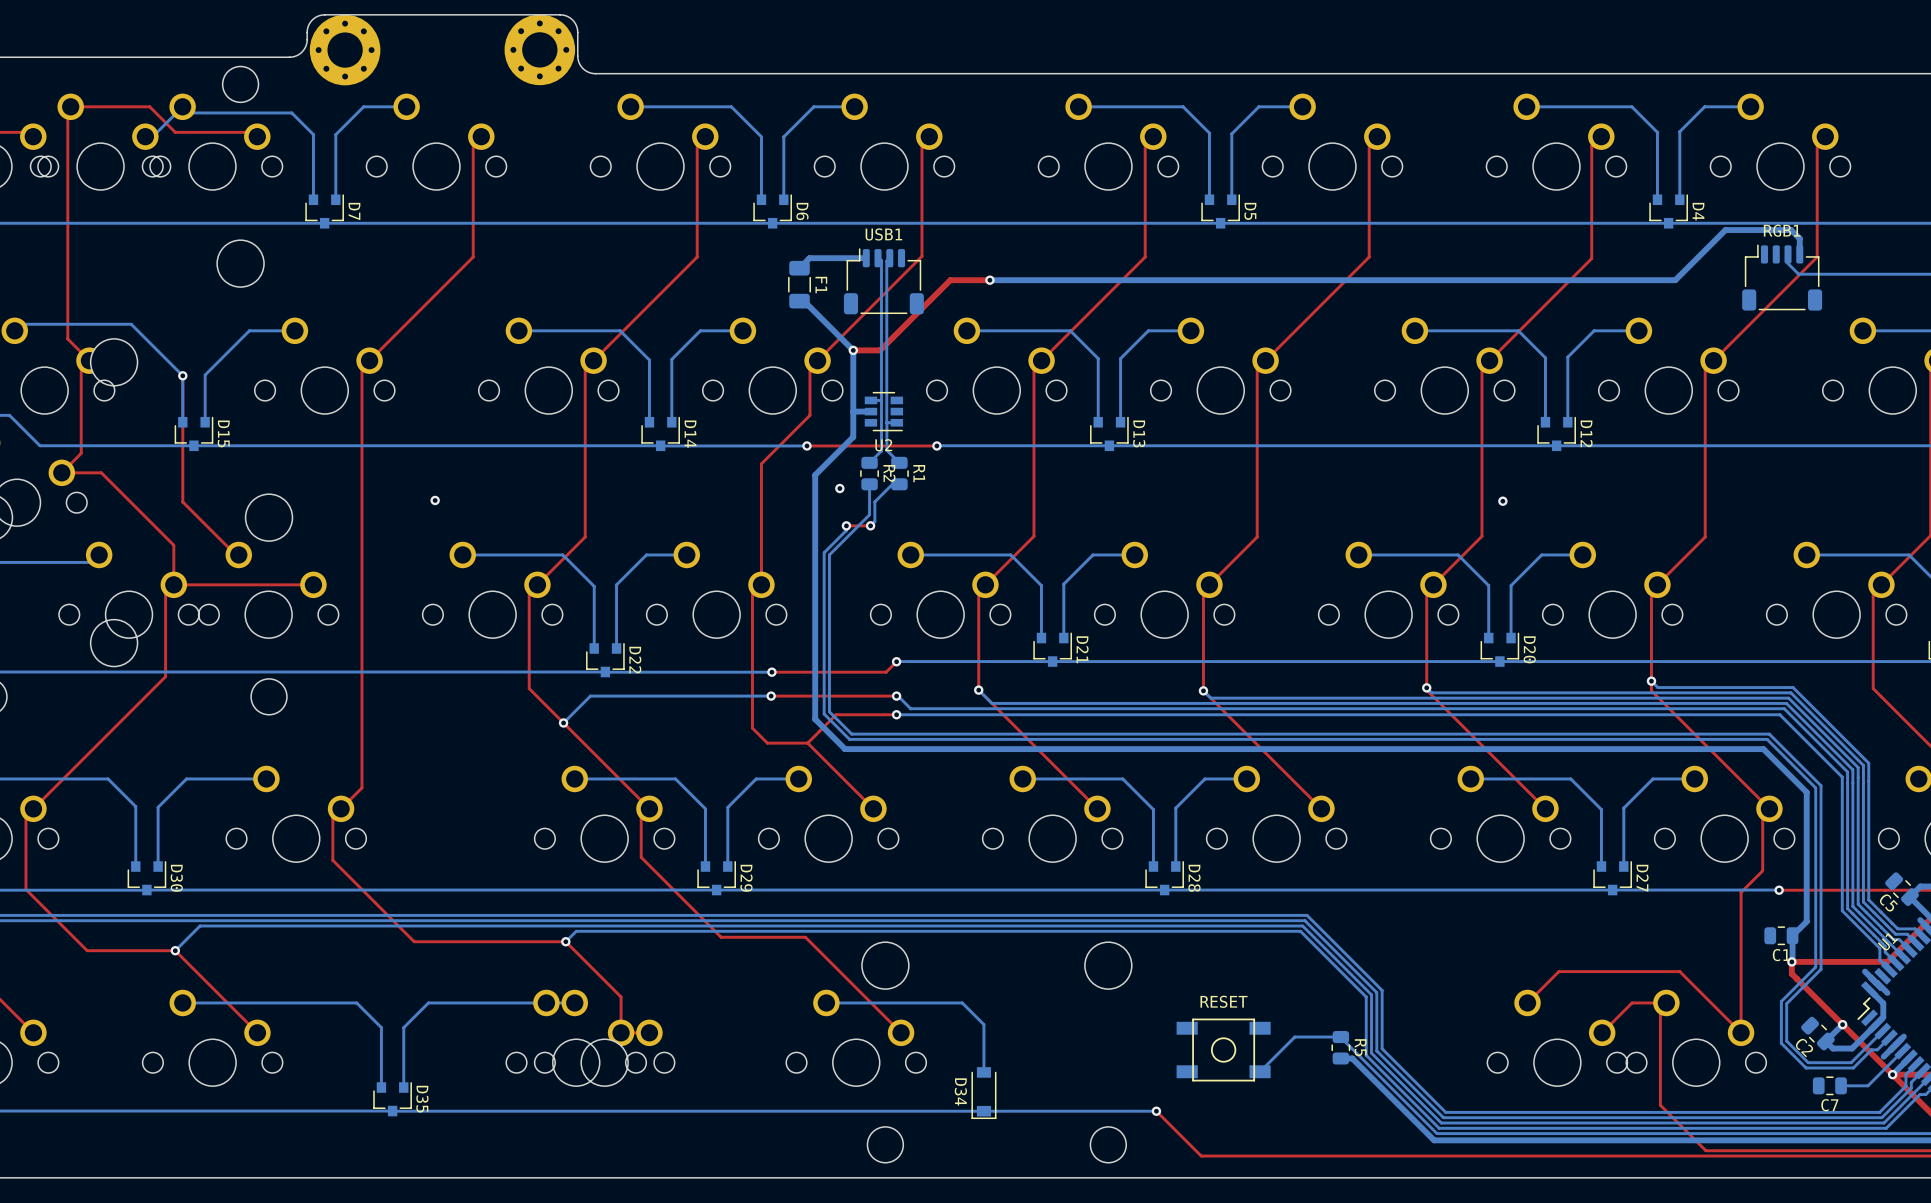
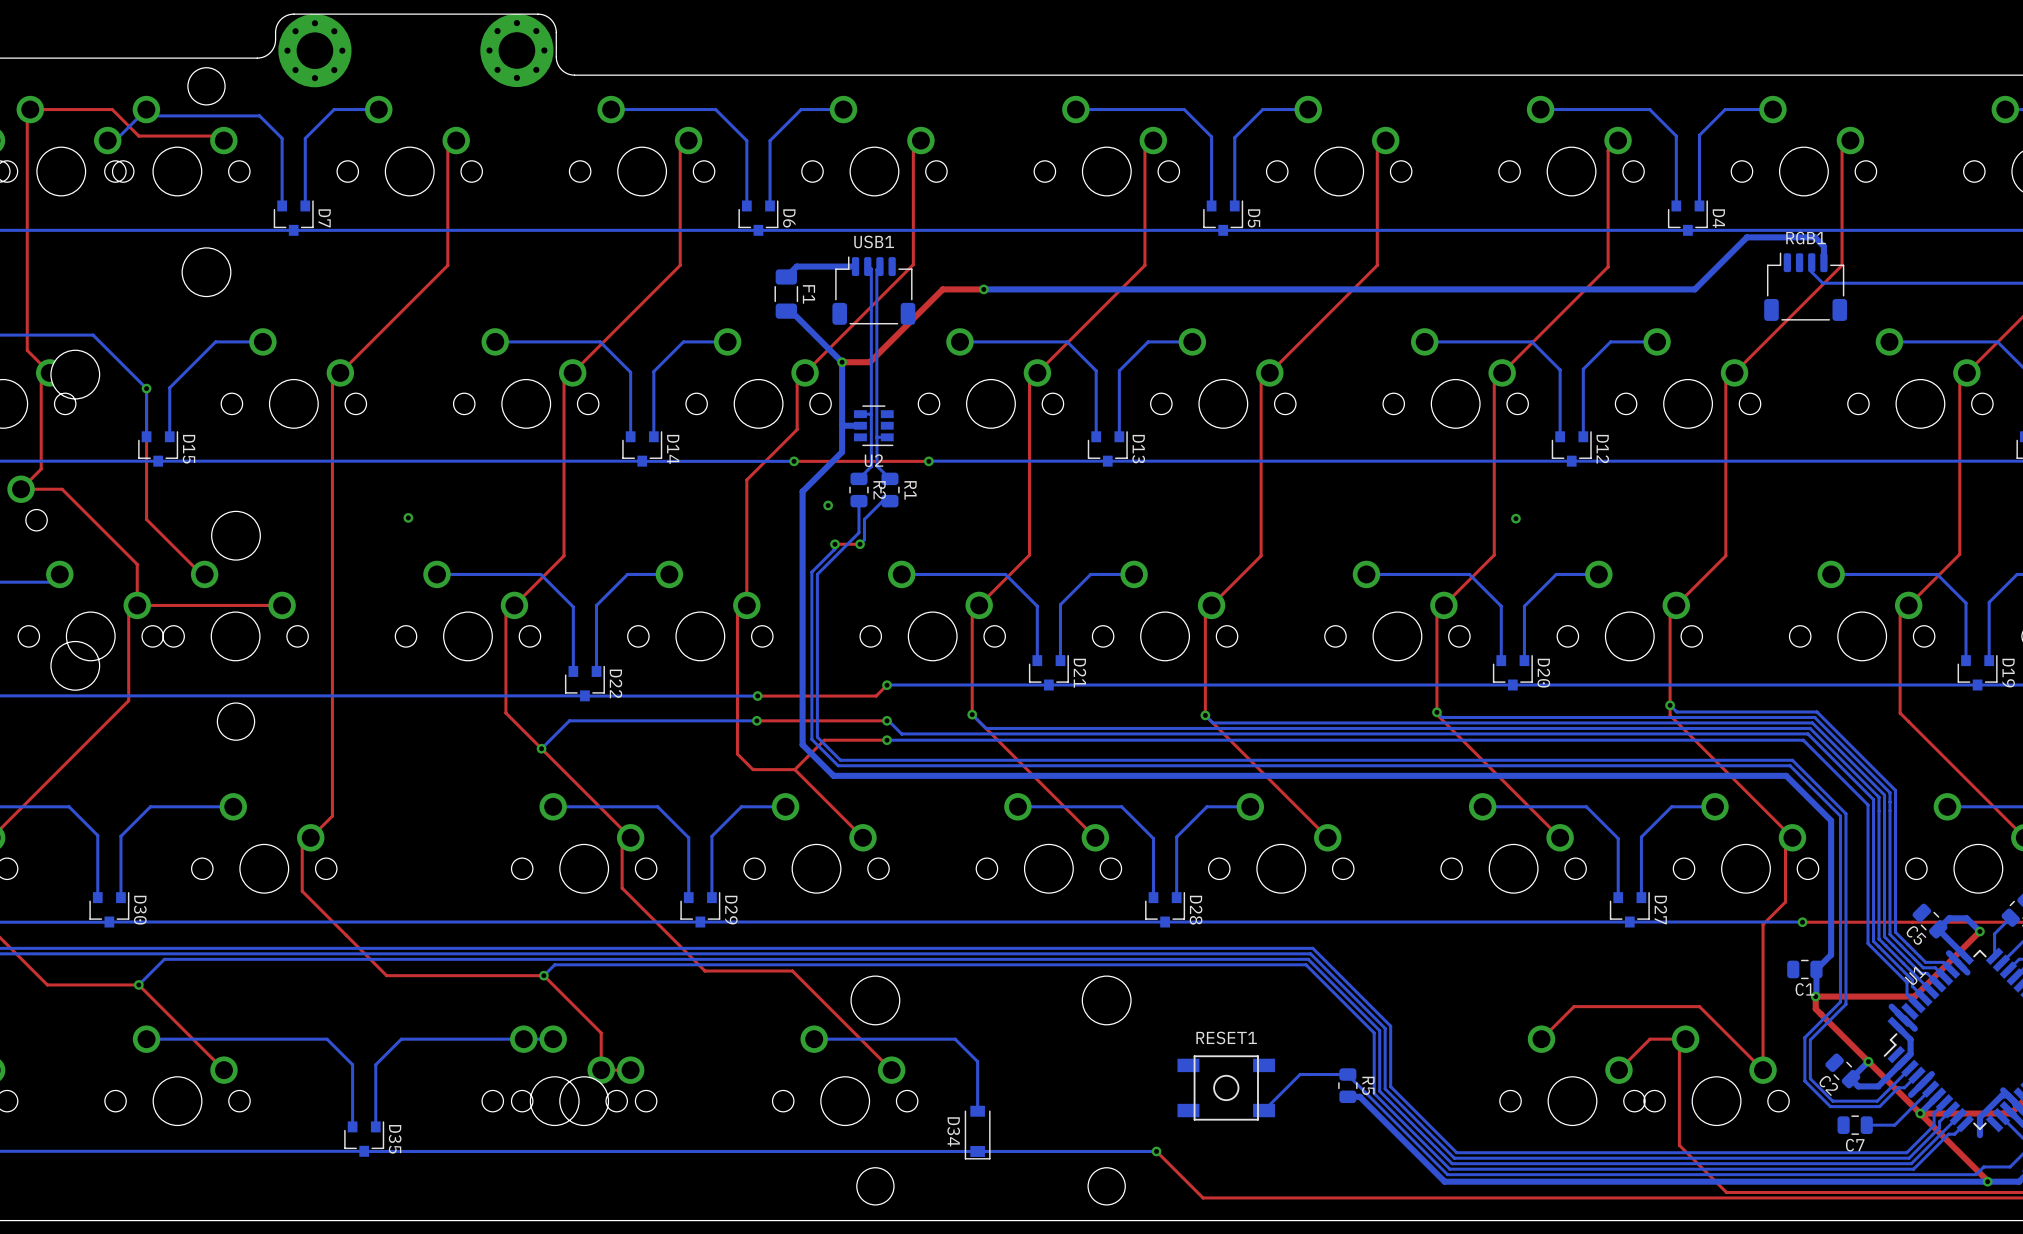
RESET name: RESET (1224, 1001) -> RESET1 (1226, 1037)

